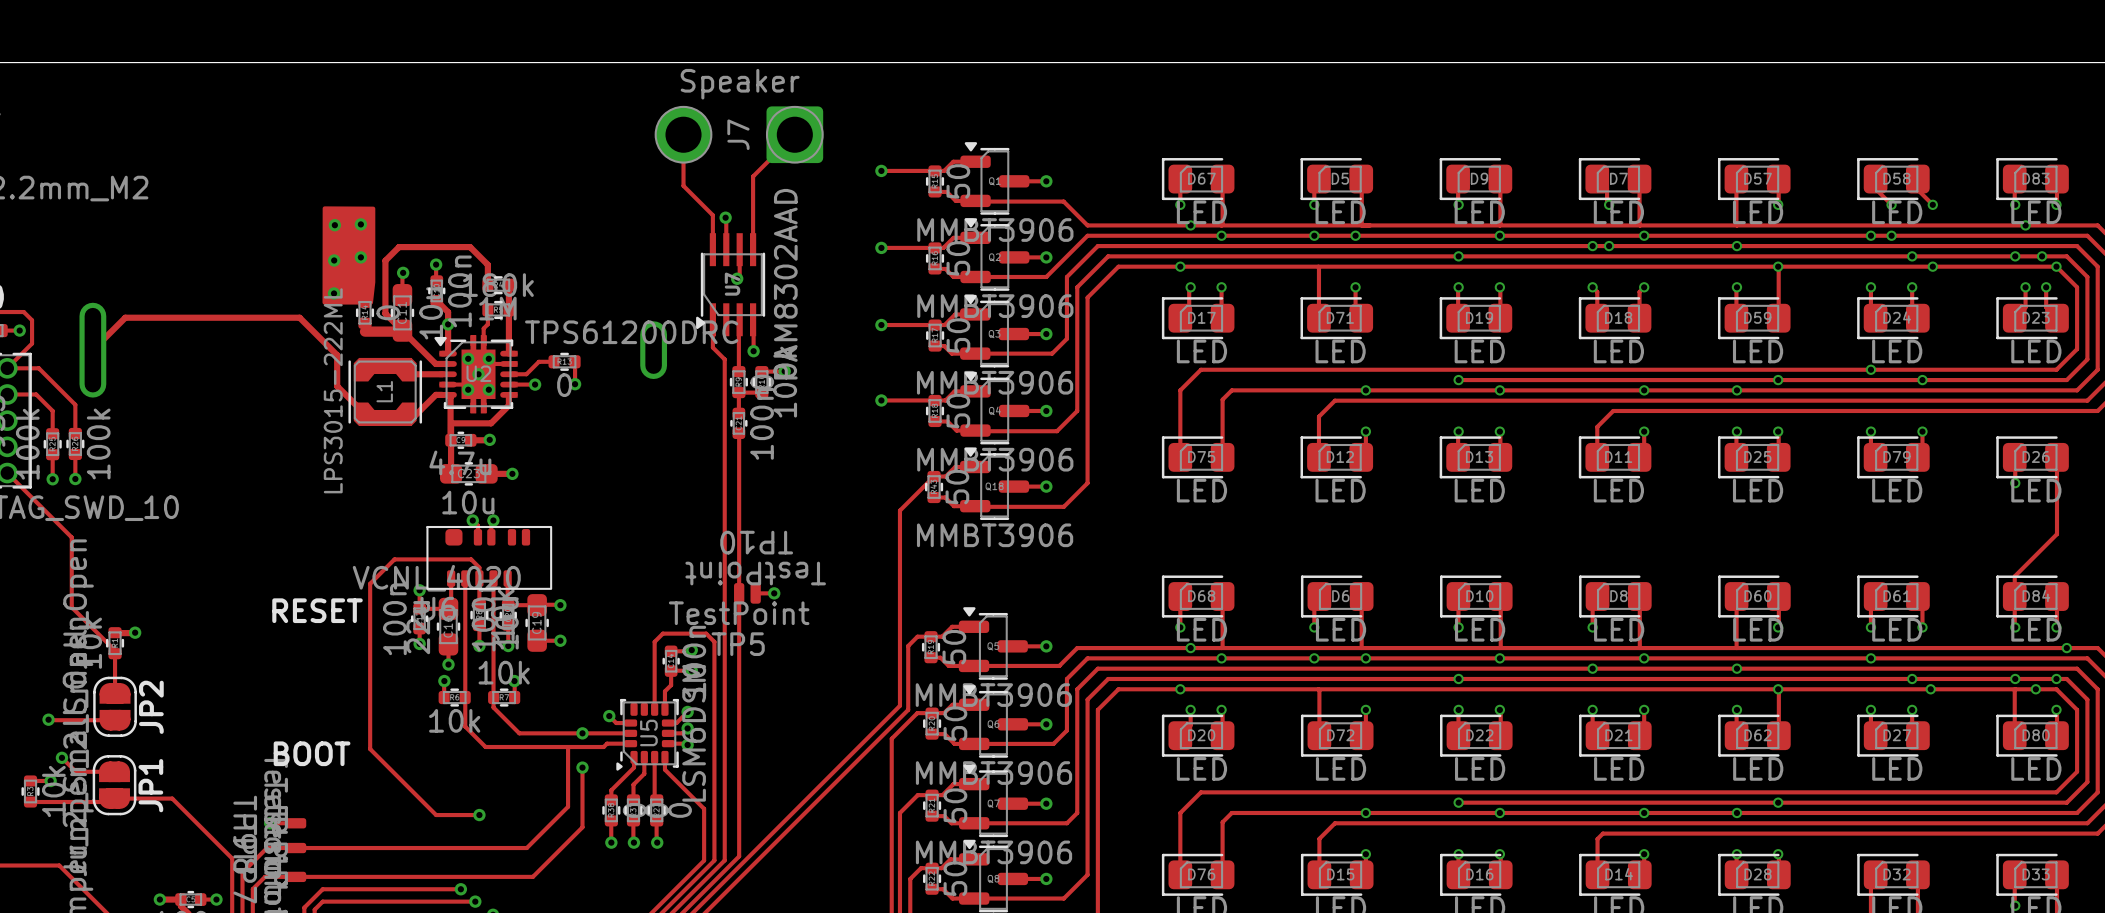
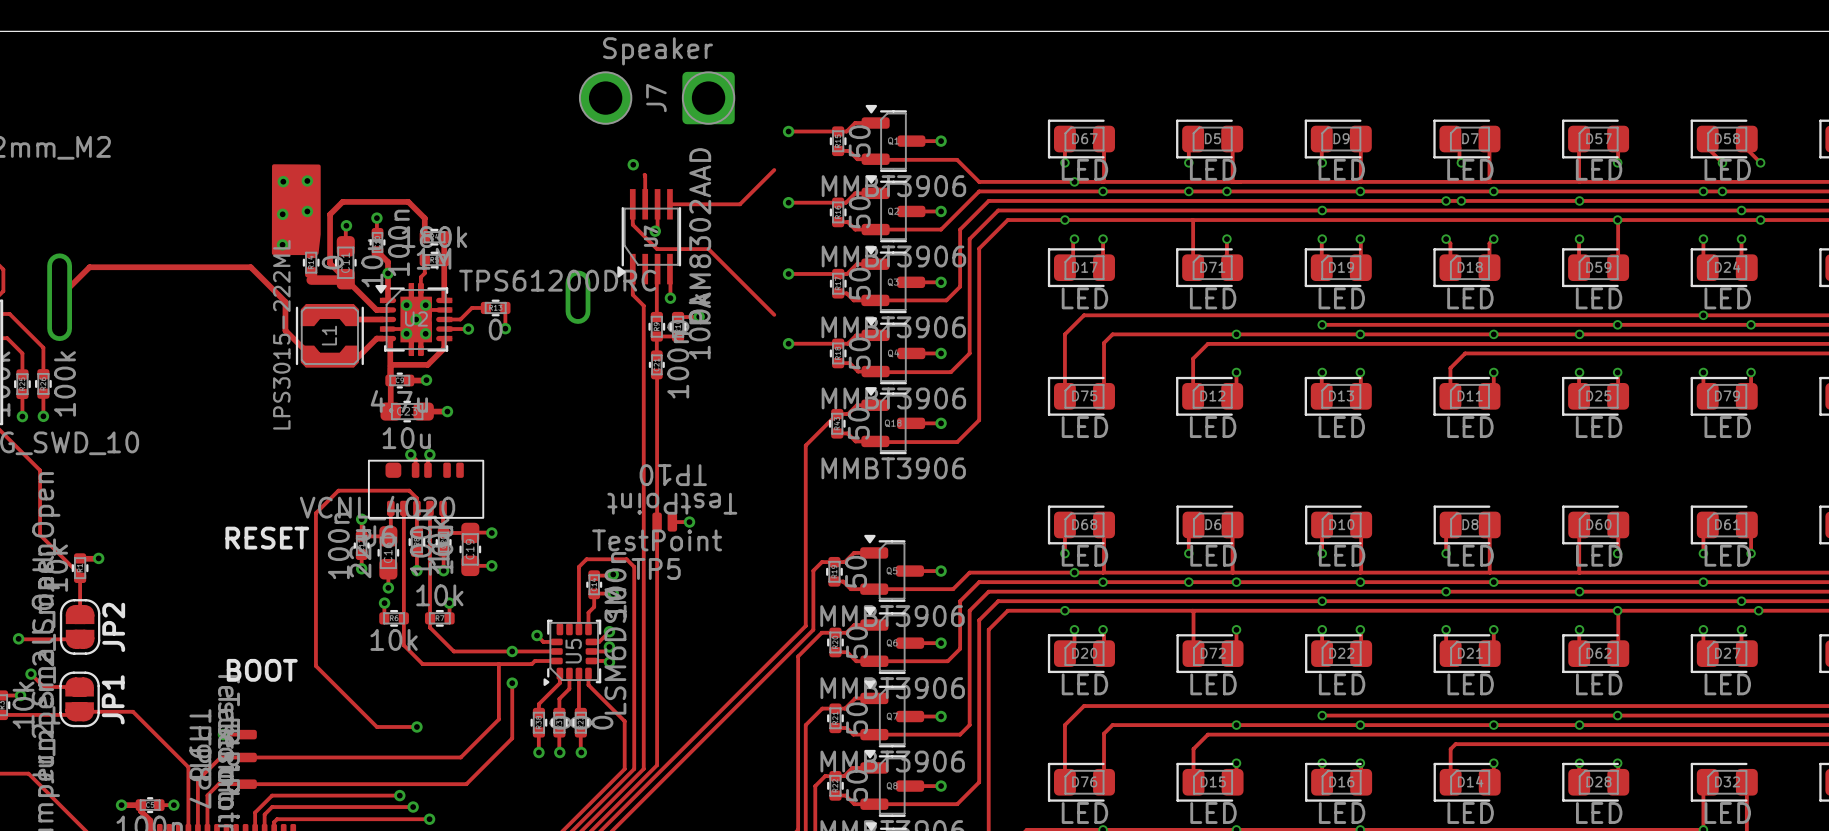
track: (683, 134) (683, 185) (712, 215) (712, 249) -> (774, 314) (708, 249) (657, 249) (632, 224) (632, 204)
track: (794, 134) (753, 176) (753, 249) -> (774, 170) (740, 204) (669, 204)
via position: (725, 217) -> (633, 164)

